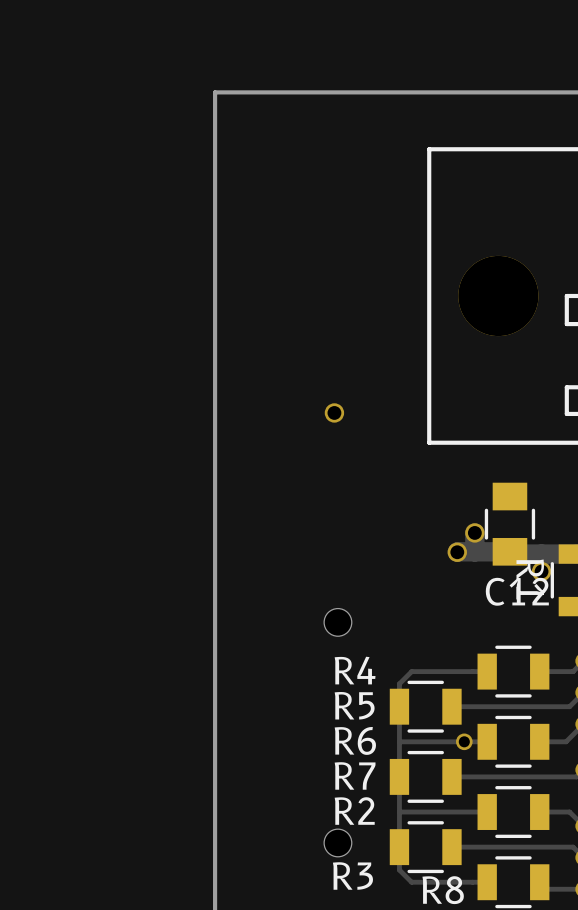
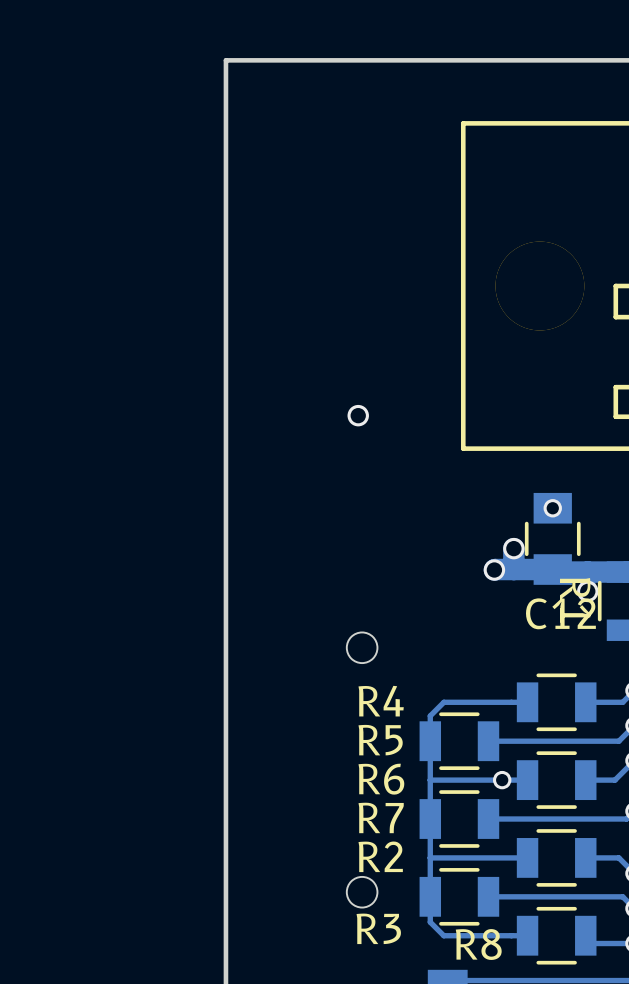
via: none -> (552, 508)

